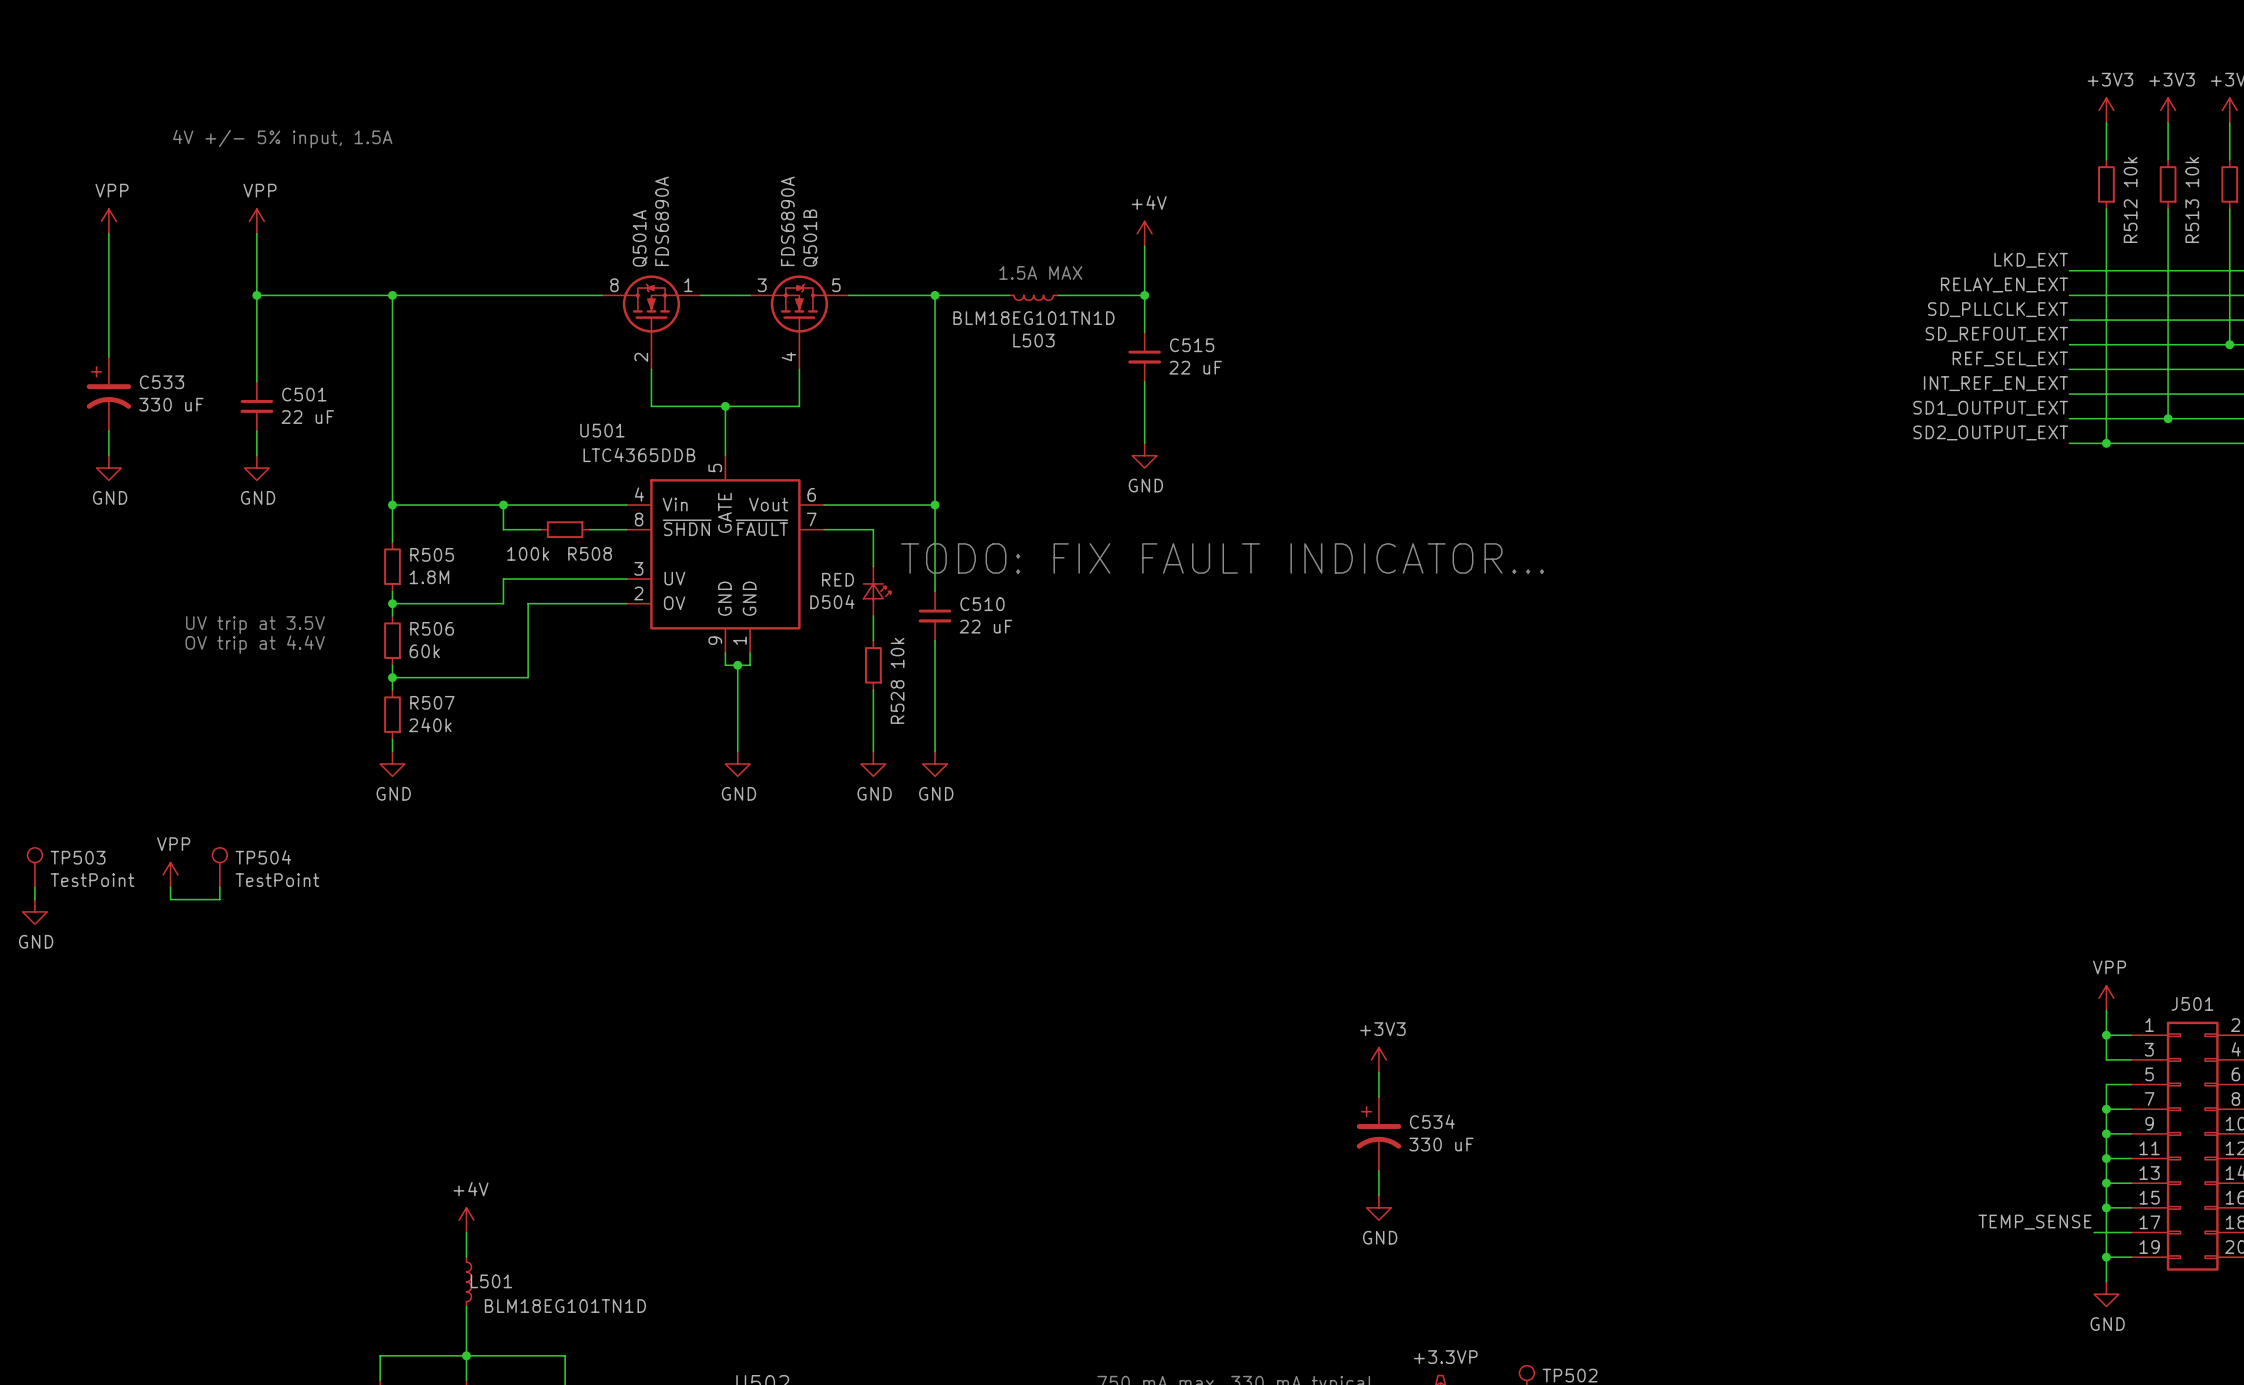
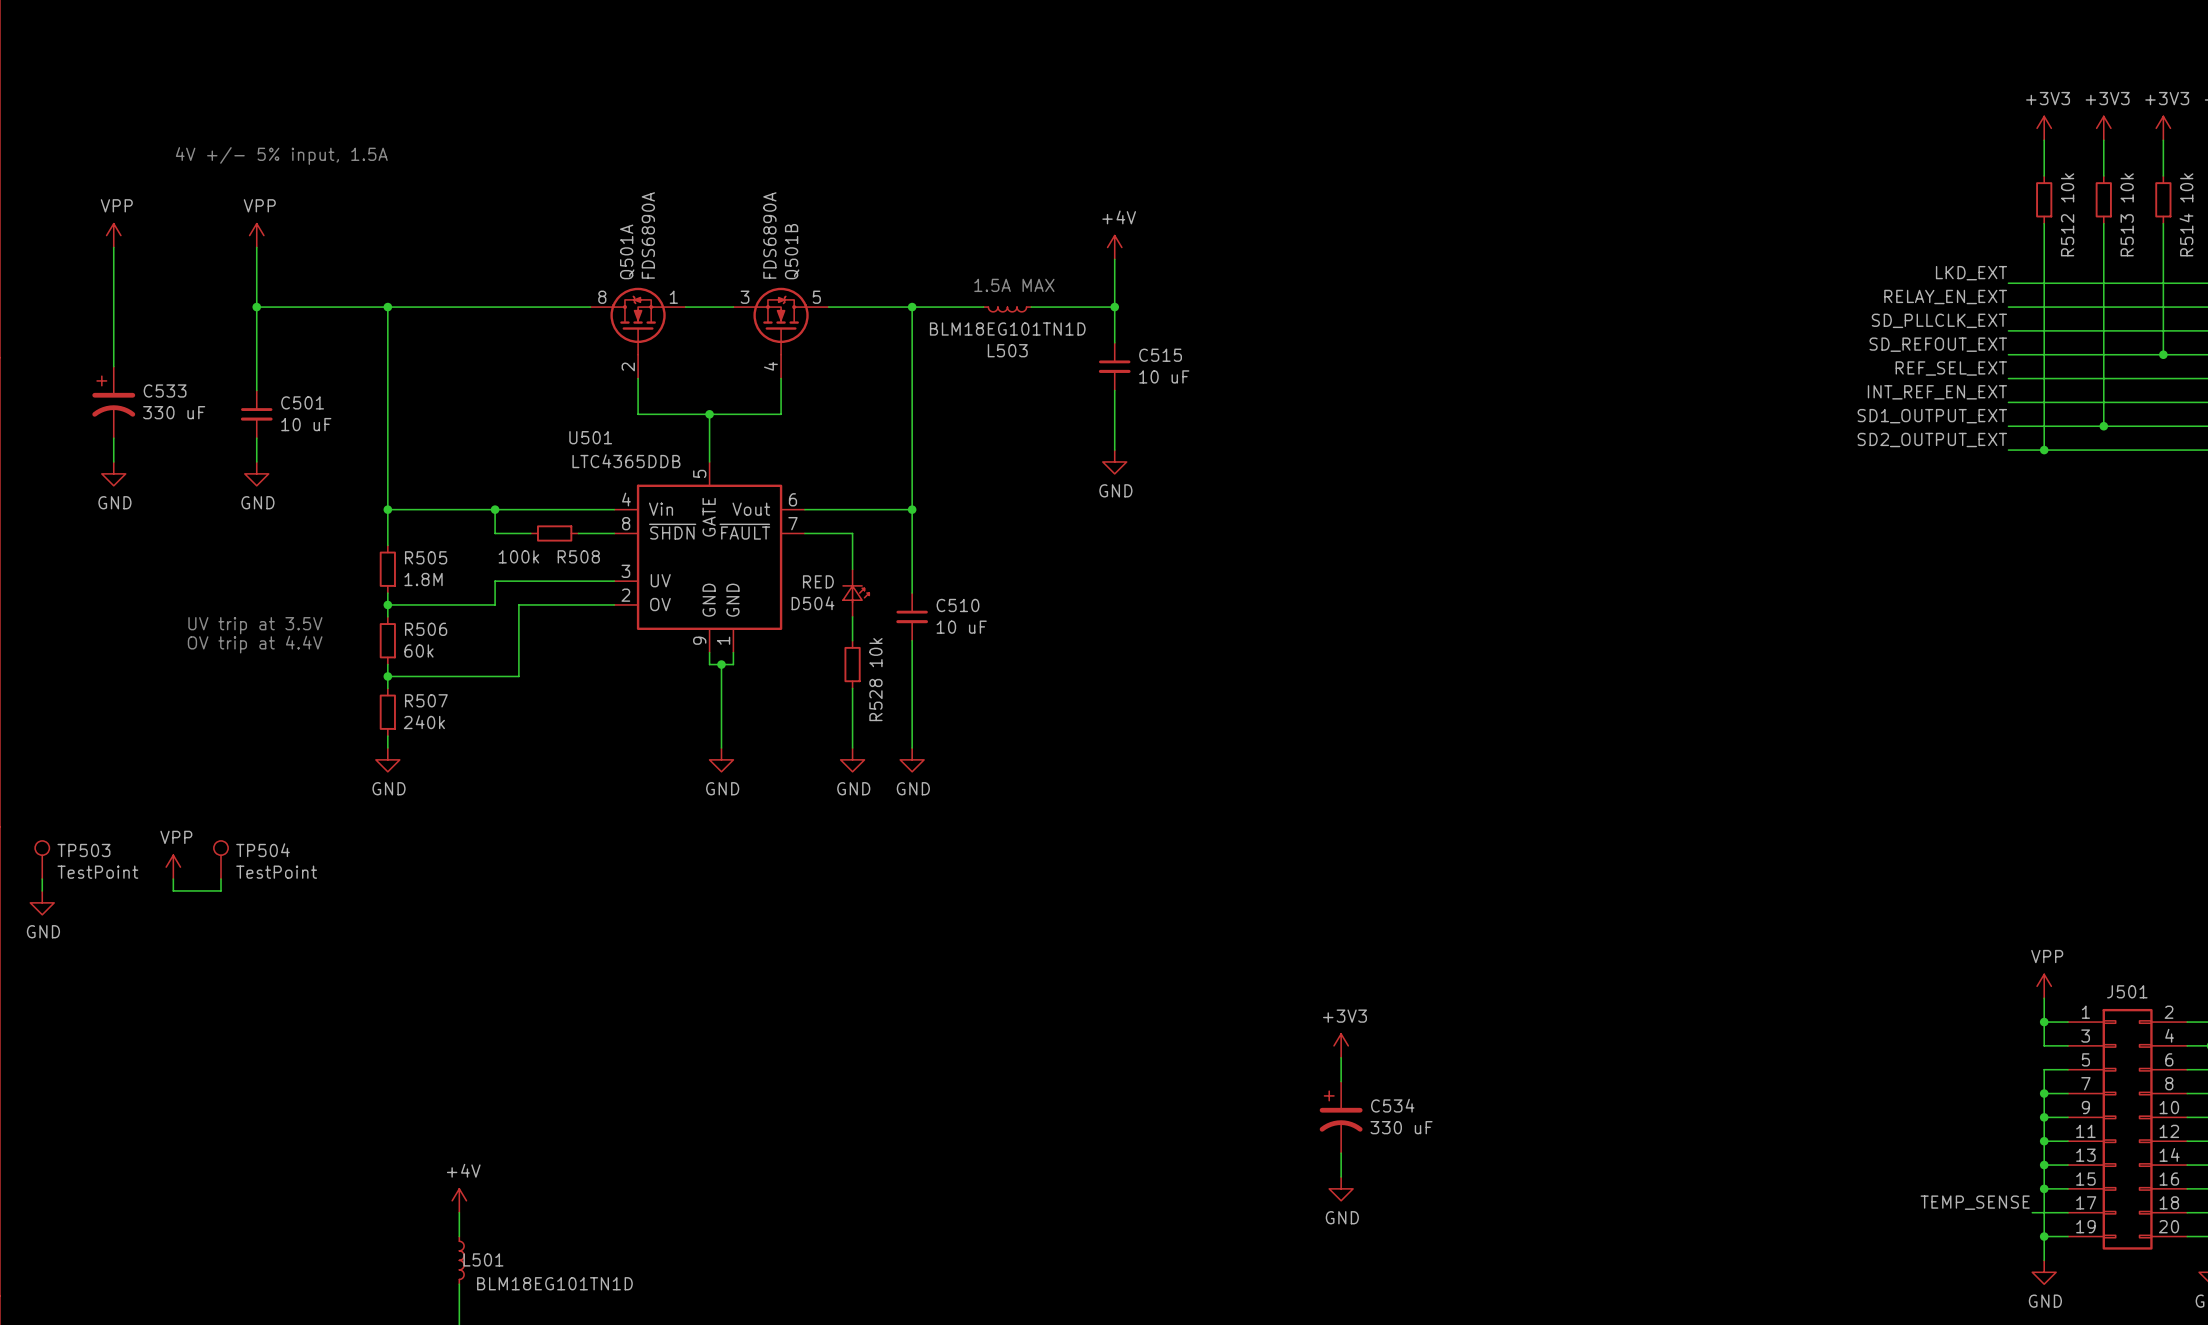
C515 value: 22 uF (1195, 367) -> 10 uF (1164, 376)
C501 value: 22 uF (307, 417) -> 10 uF (306, 424)
text: TODO: FIX FAULT INDICATOR... (1222, 558) -> none
C510 value: 22 uF (986, 626) -> 10 uF (961, 627)

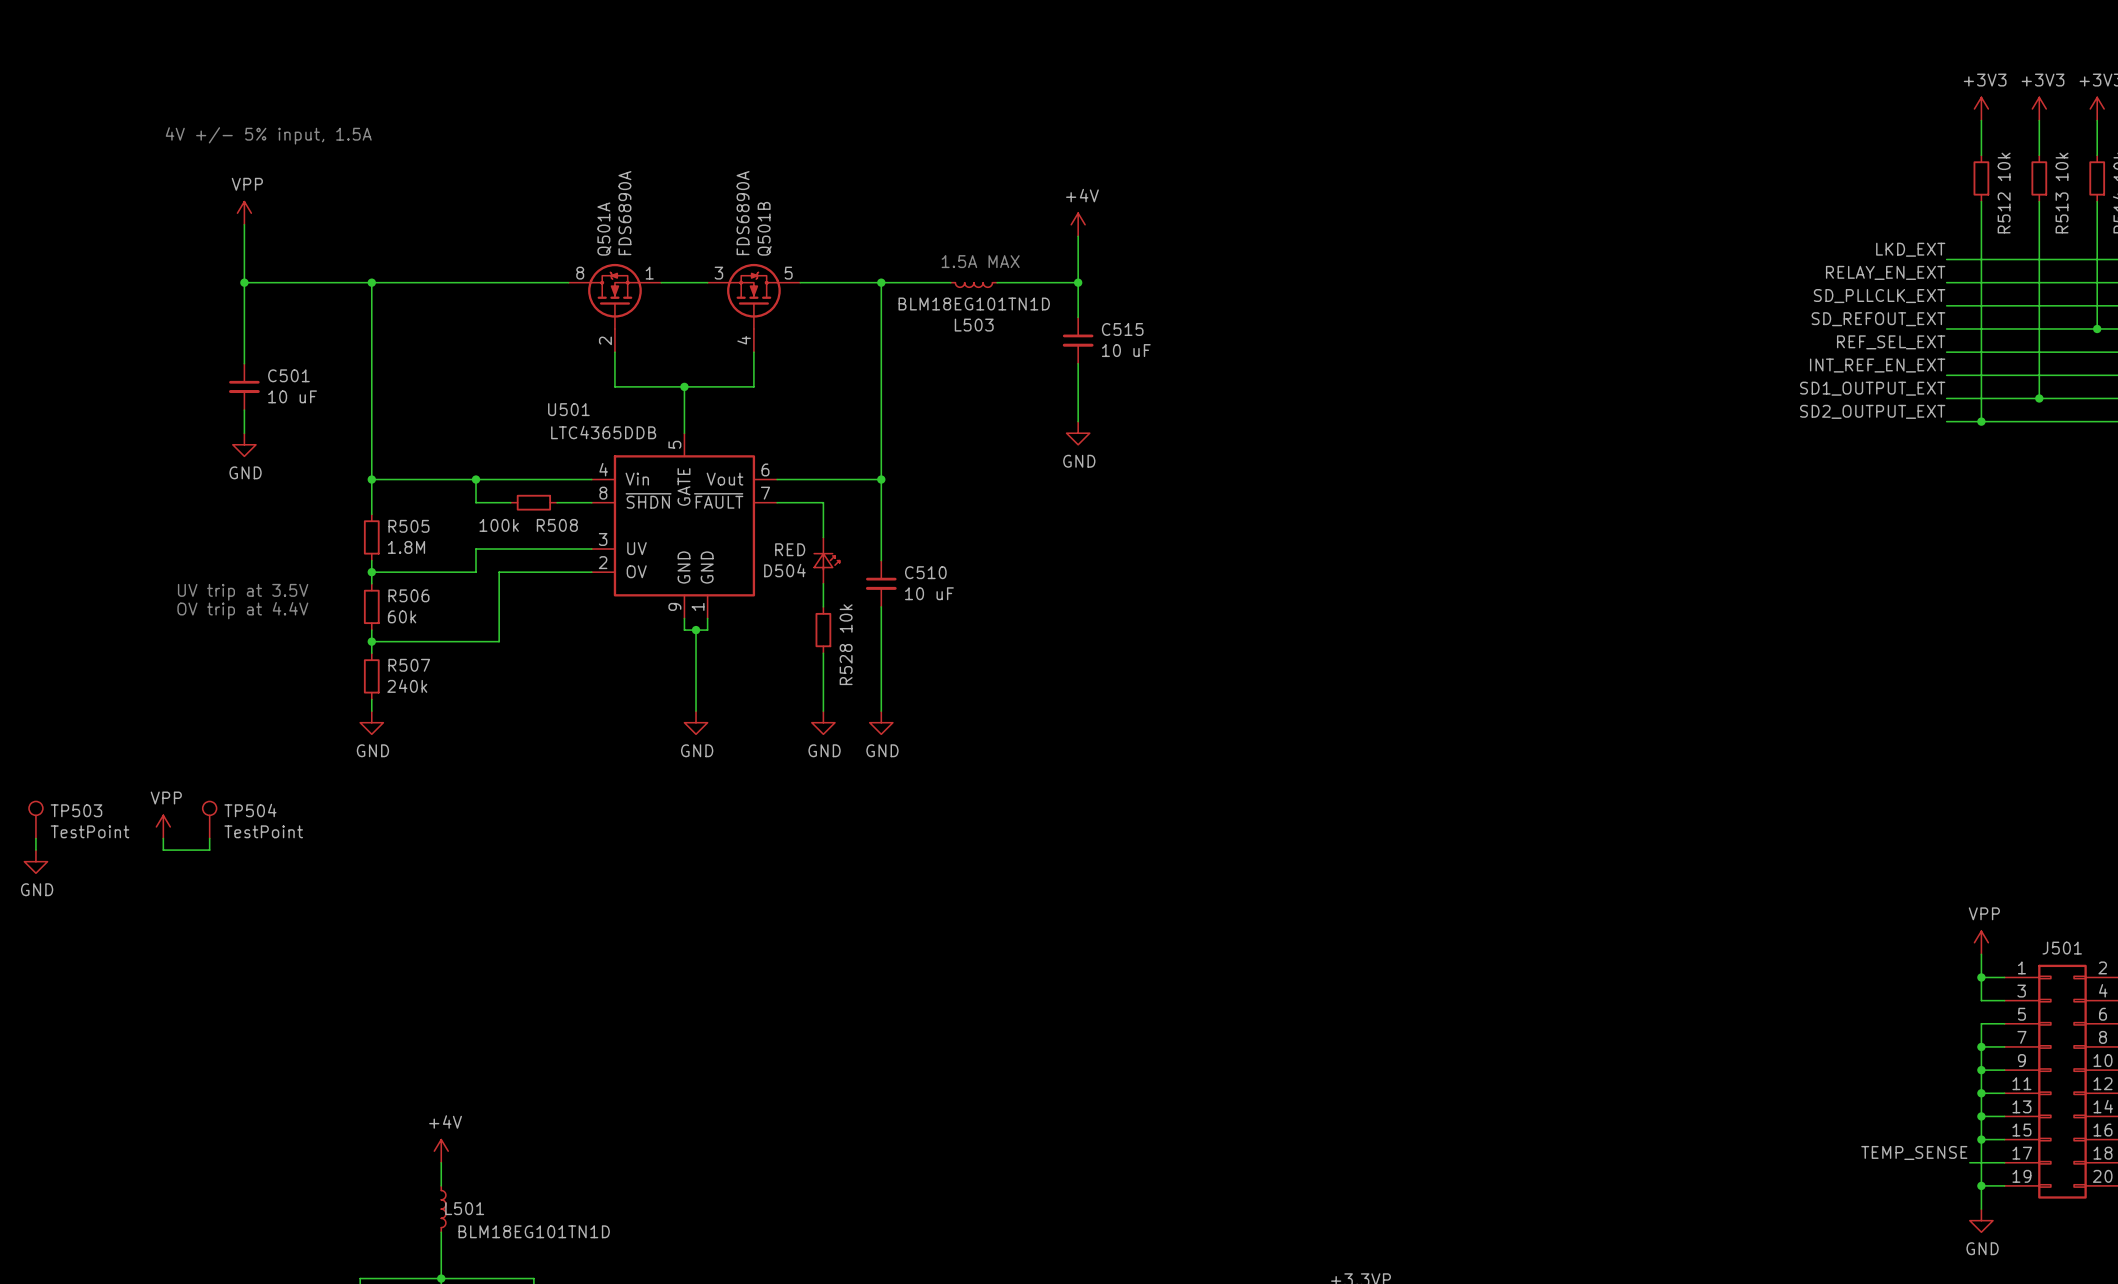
power symbol: VPP (113, 235) -> none
wire: (113, 247) (113, 366) -> none
C533: 330 uF (113, 402) -> none
wire: (113, 438) (113, 461) -> none
power symbol: GND (113, 473) -> none
power symbol: +3V3 (1341, 1045) -> none
wire: (1341, 1057) (1341, 1081) -> none
C534: 330 uF (1341, 1117) -> none
wire: (1341, 1153) (1341, 1176) -> none
power symbol: GND (1341, 1188) -> none

